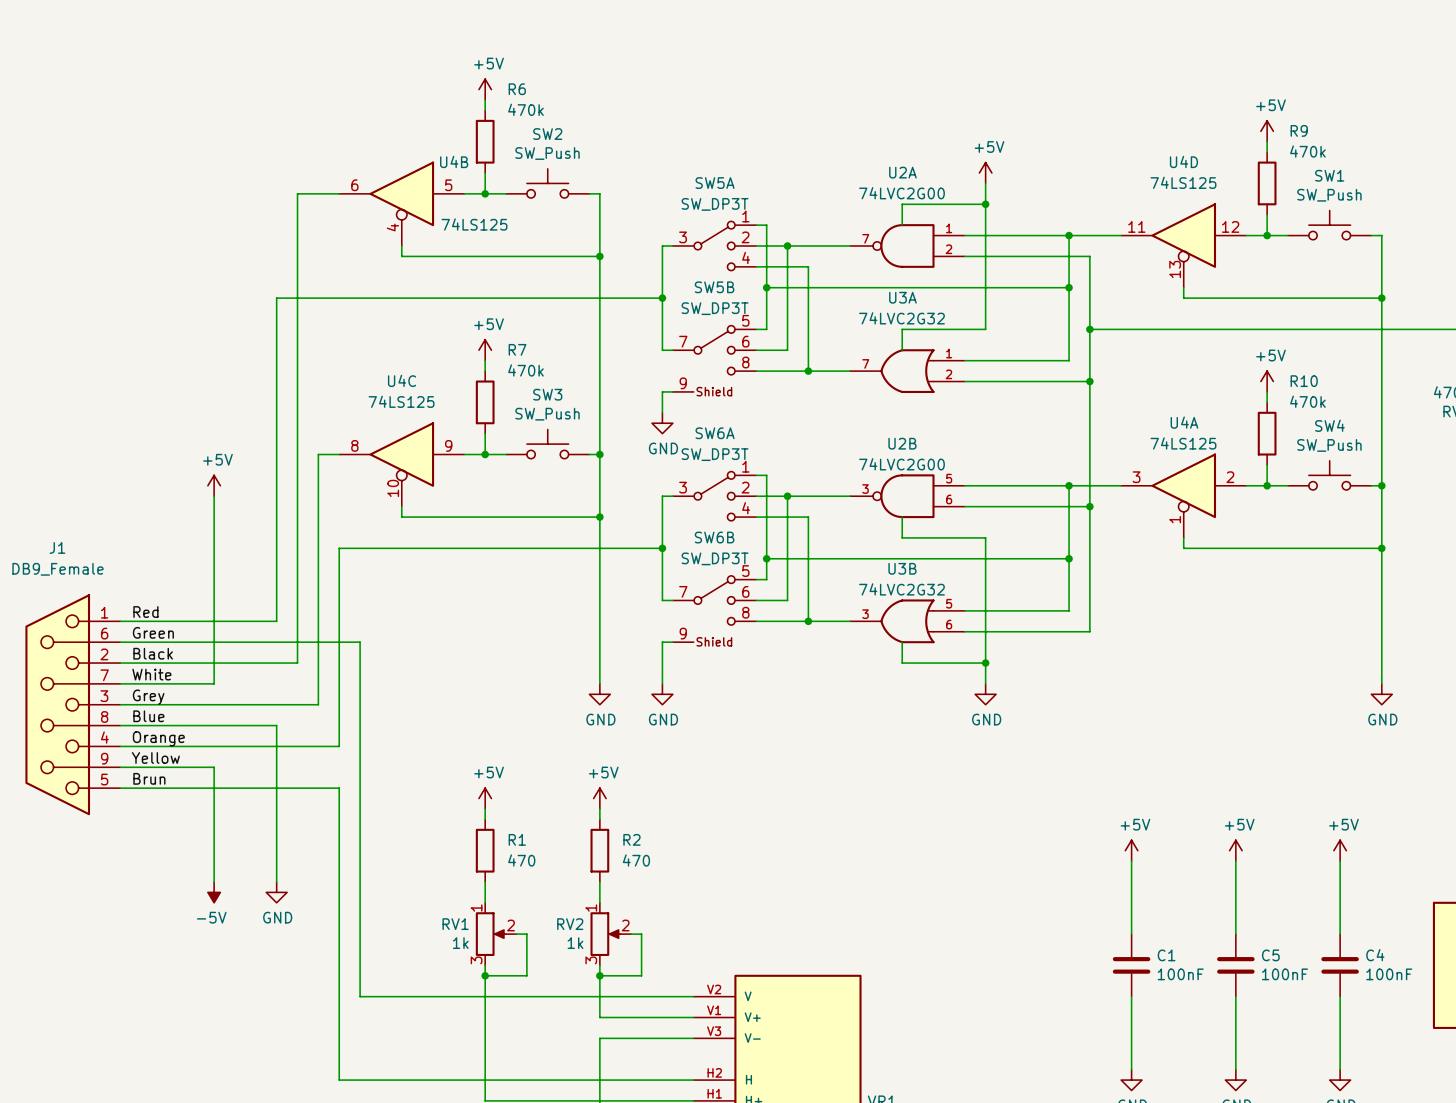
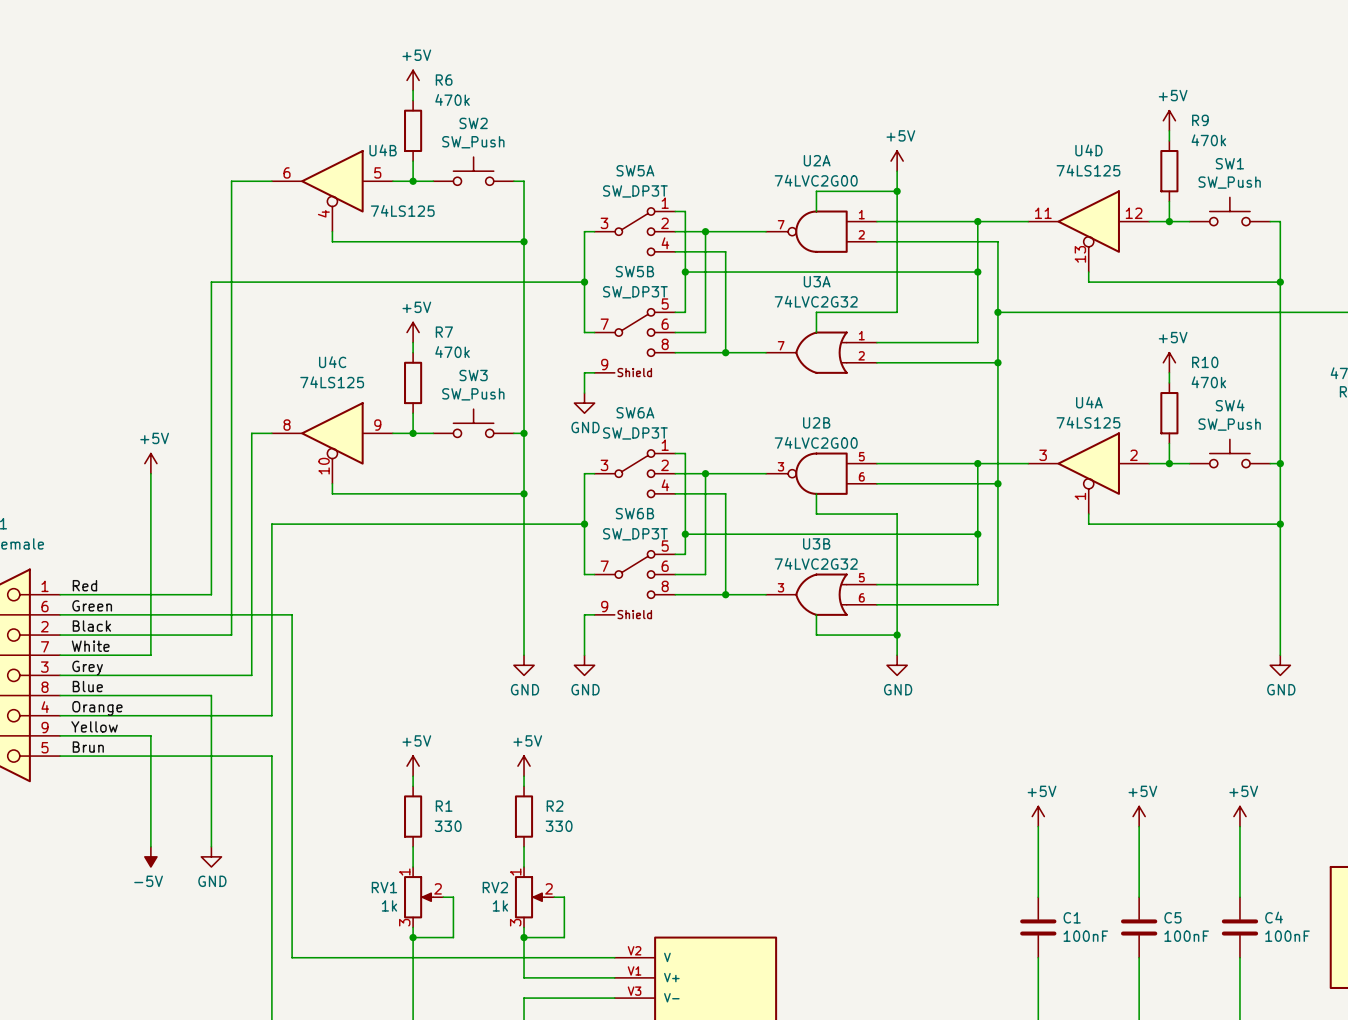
R1 value: 470 (521, 860) -> 330 (448, 826)
R2 value: 470 (636, 860) -> 330 (559, 826)

